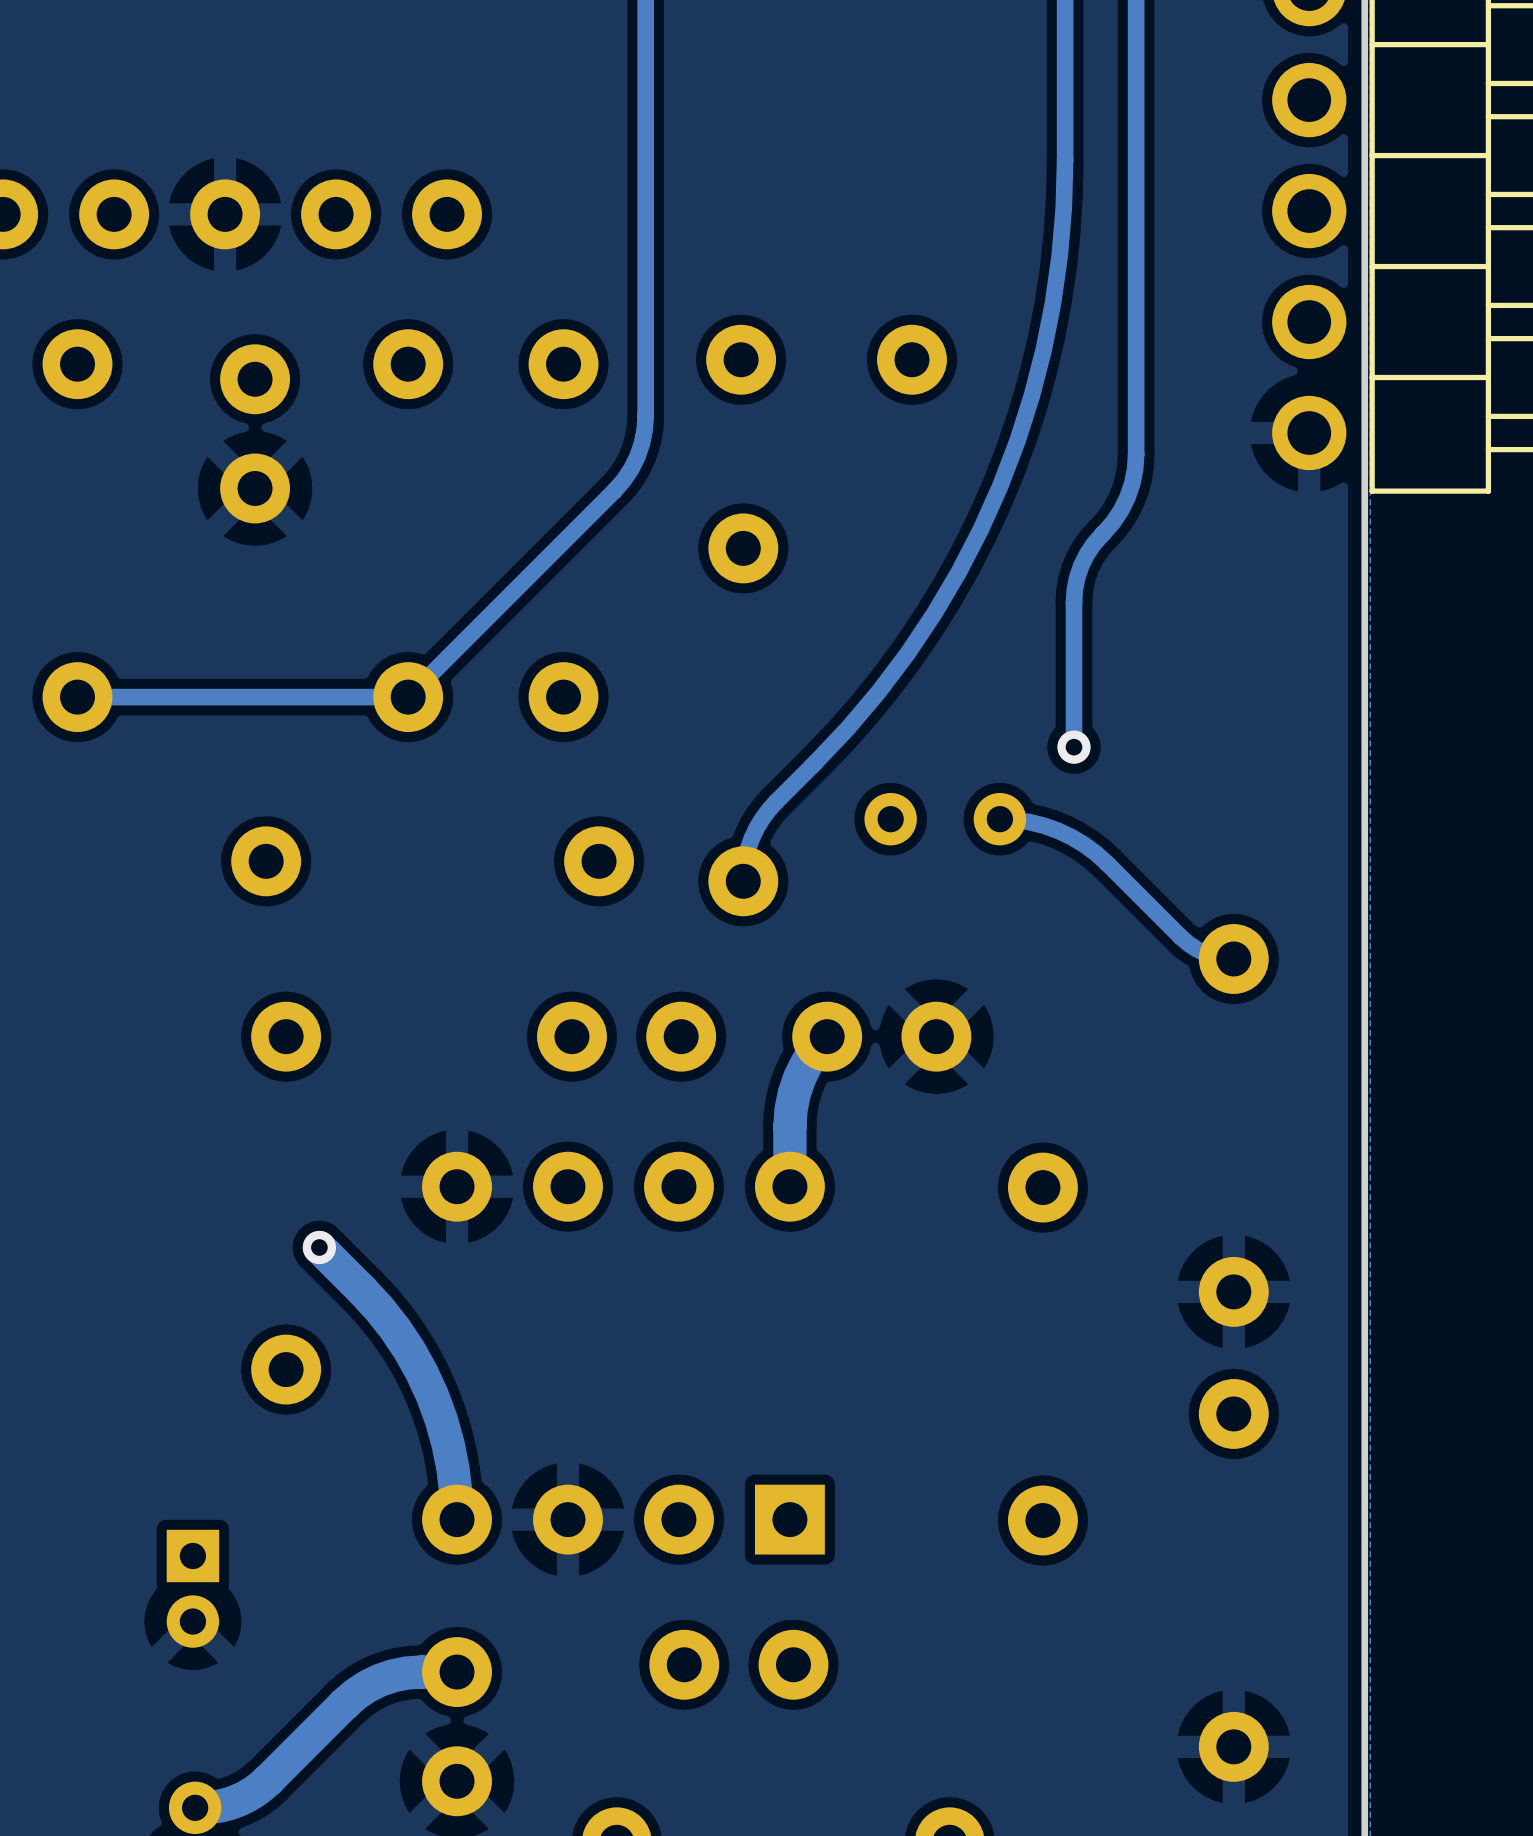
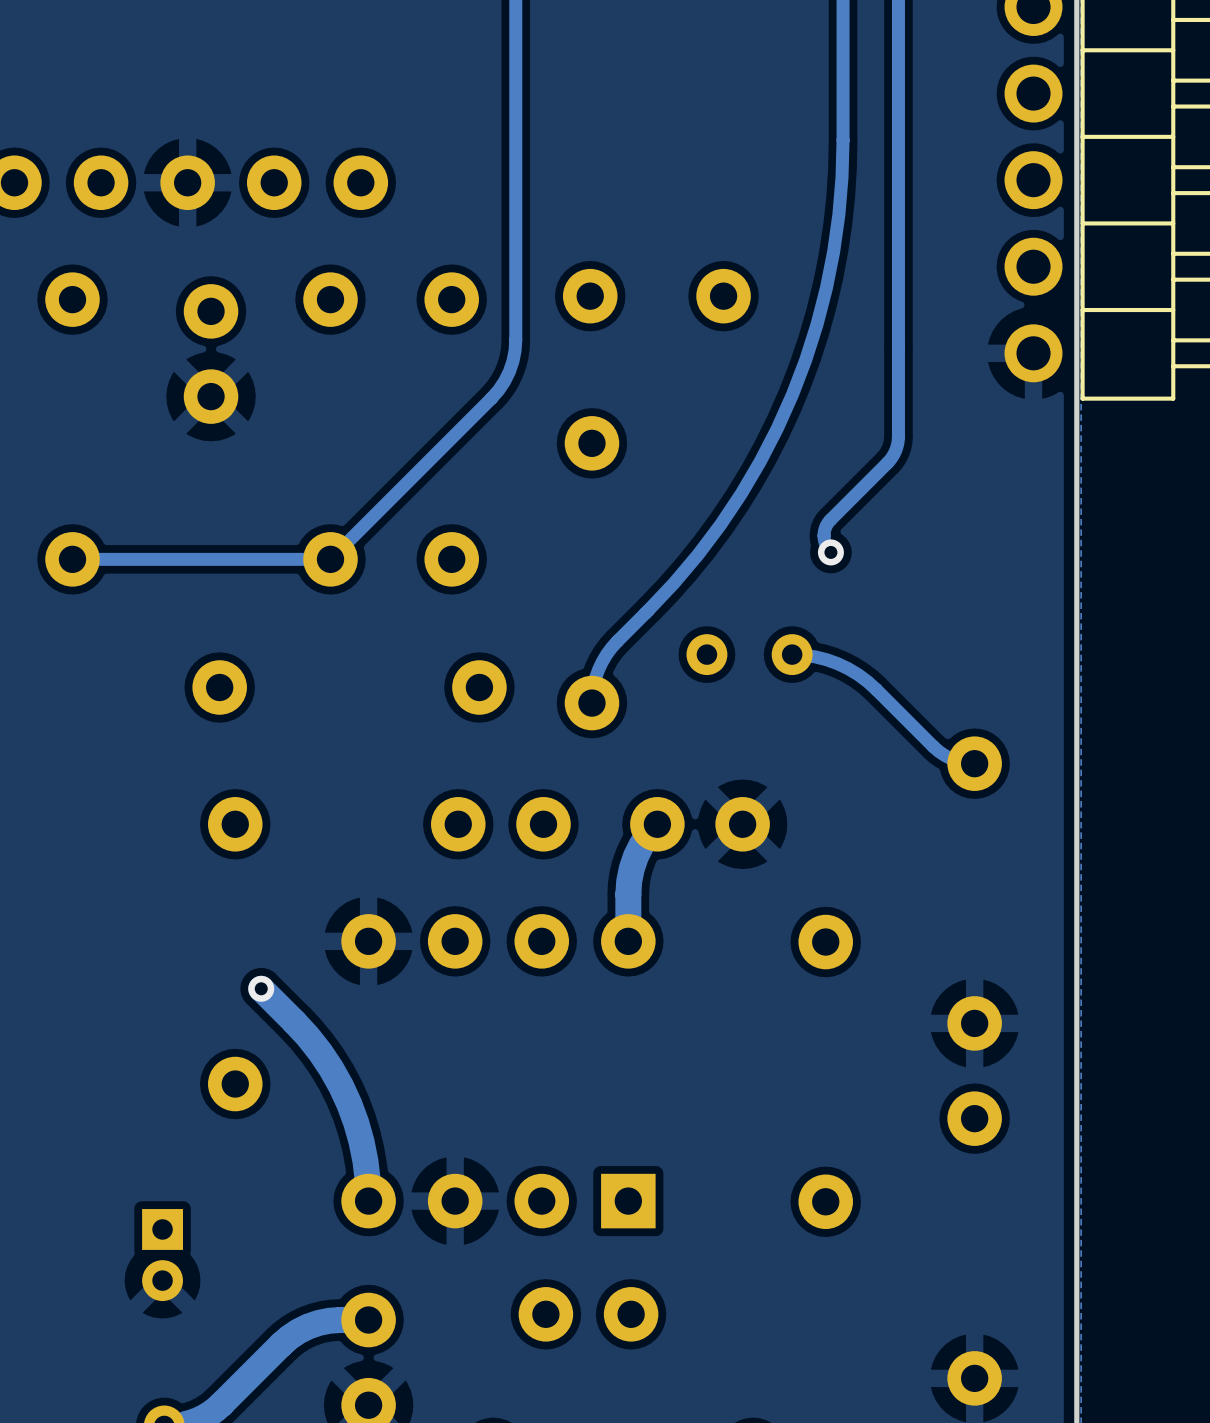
track: (1136, 454) (1132, 483) (1127, 497) (1113, 522) (1086, 554) (1077, 577) (1074, 602) (1074, 747) -> (898, 369) (898, 436) (895, 450) (887, 463) (827, 523) (824, 538) (830, 552)
via position: (1074, 747) -> (830, 552)

